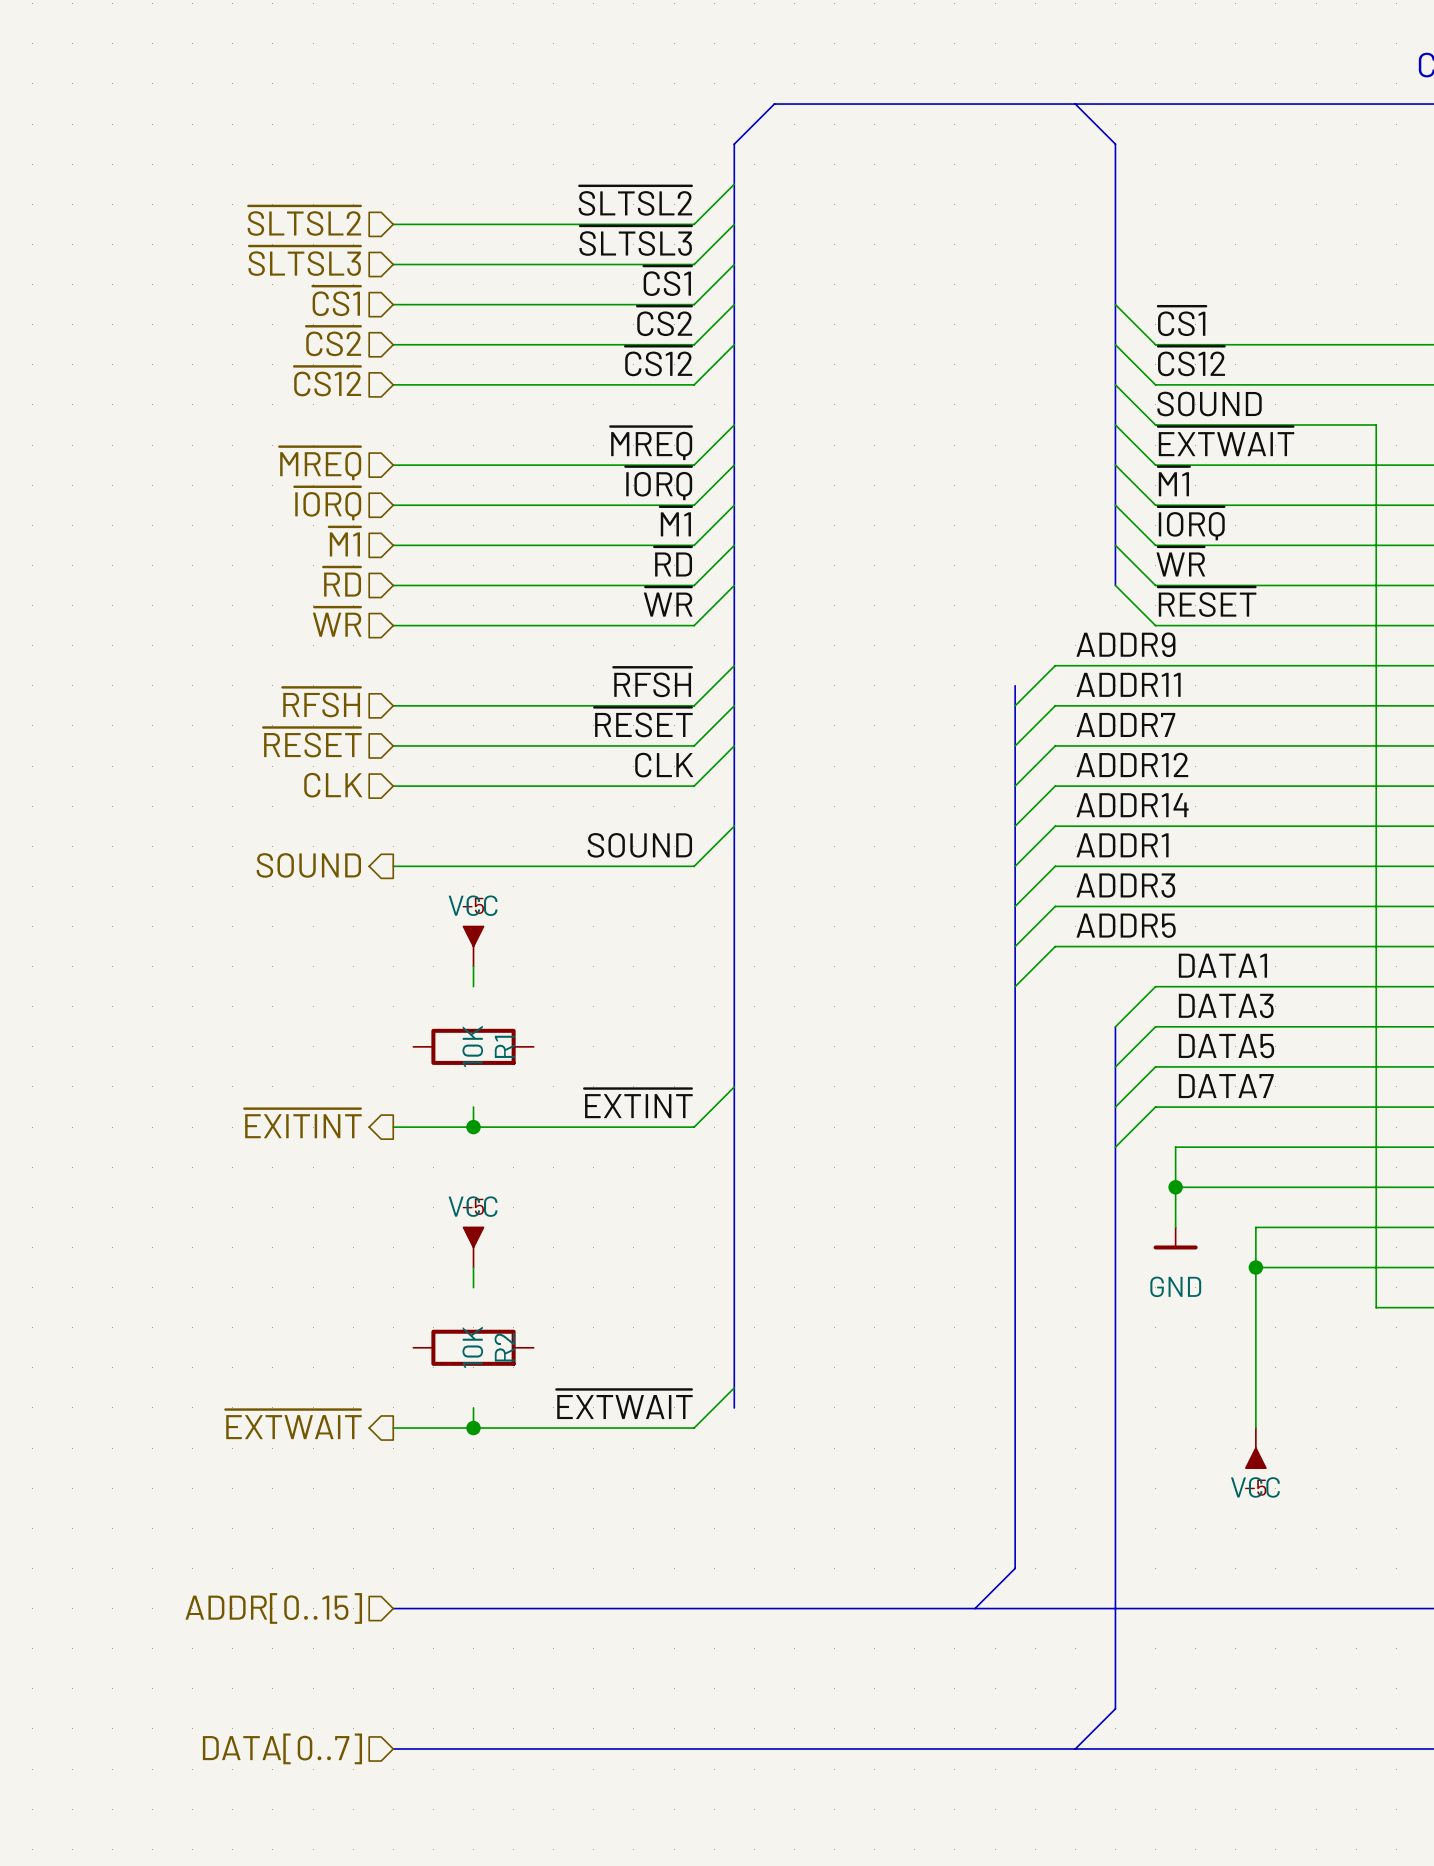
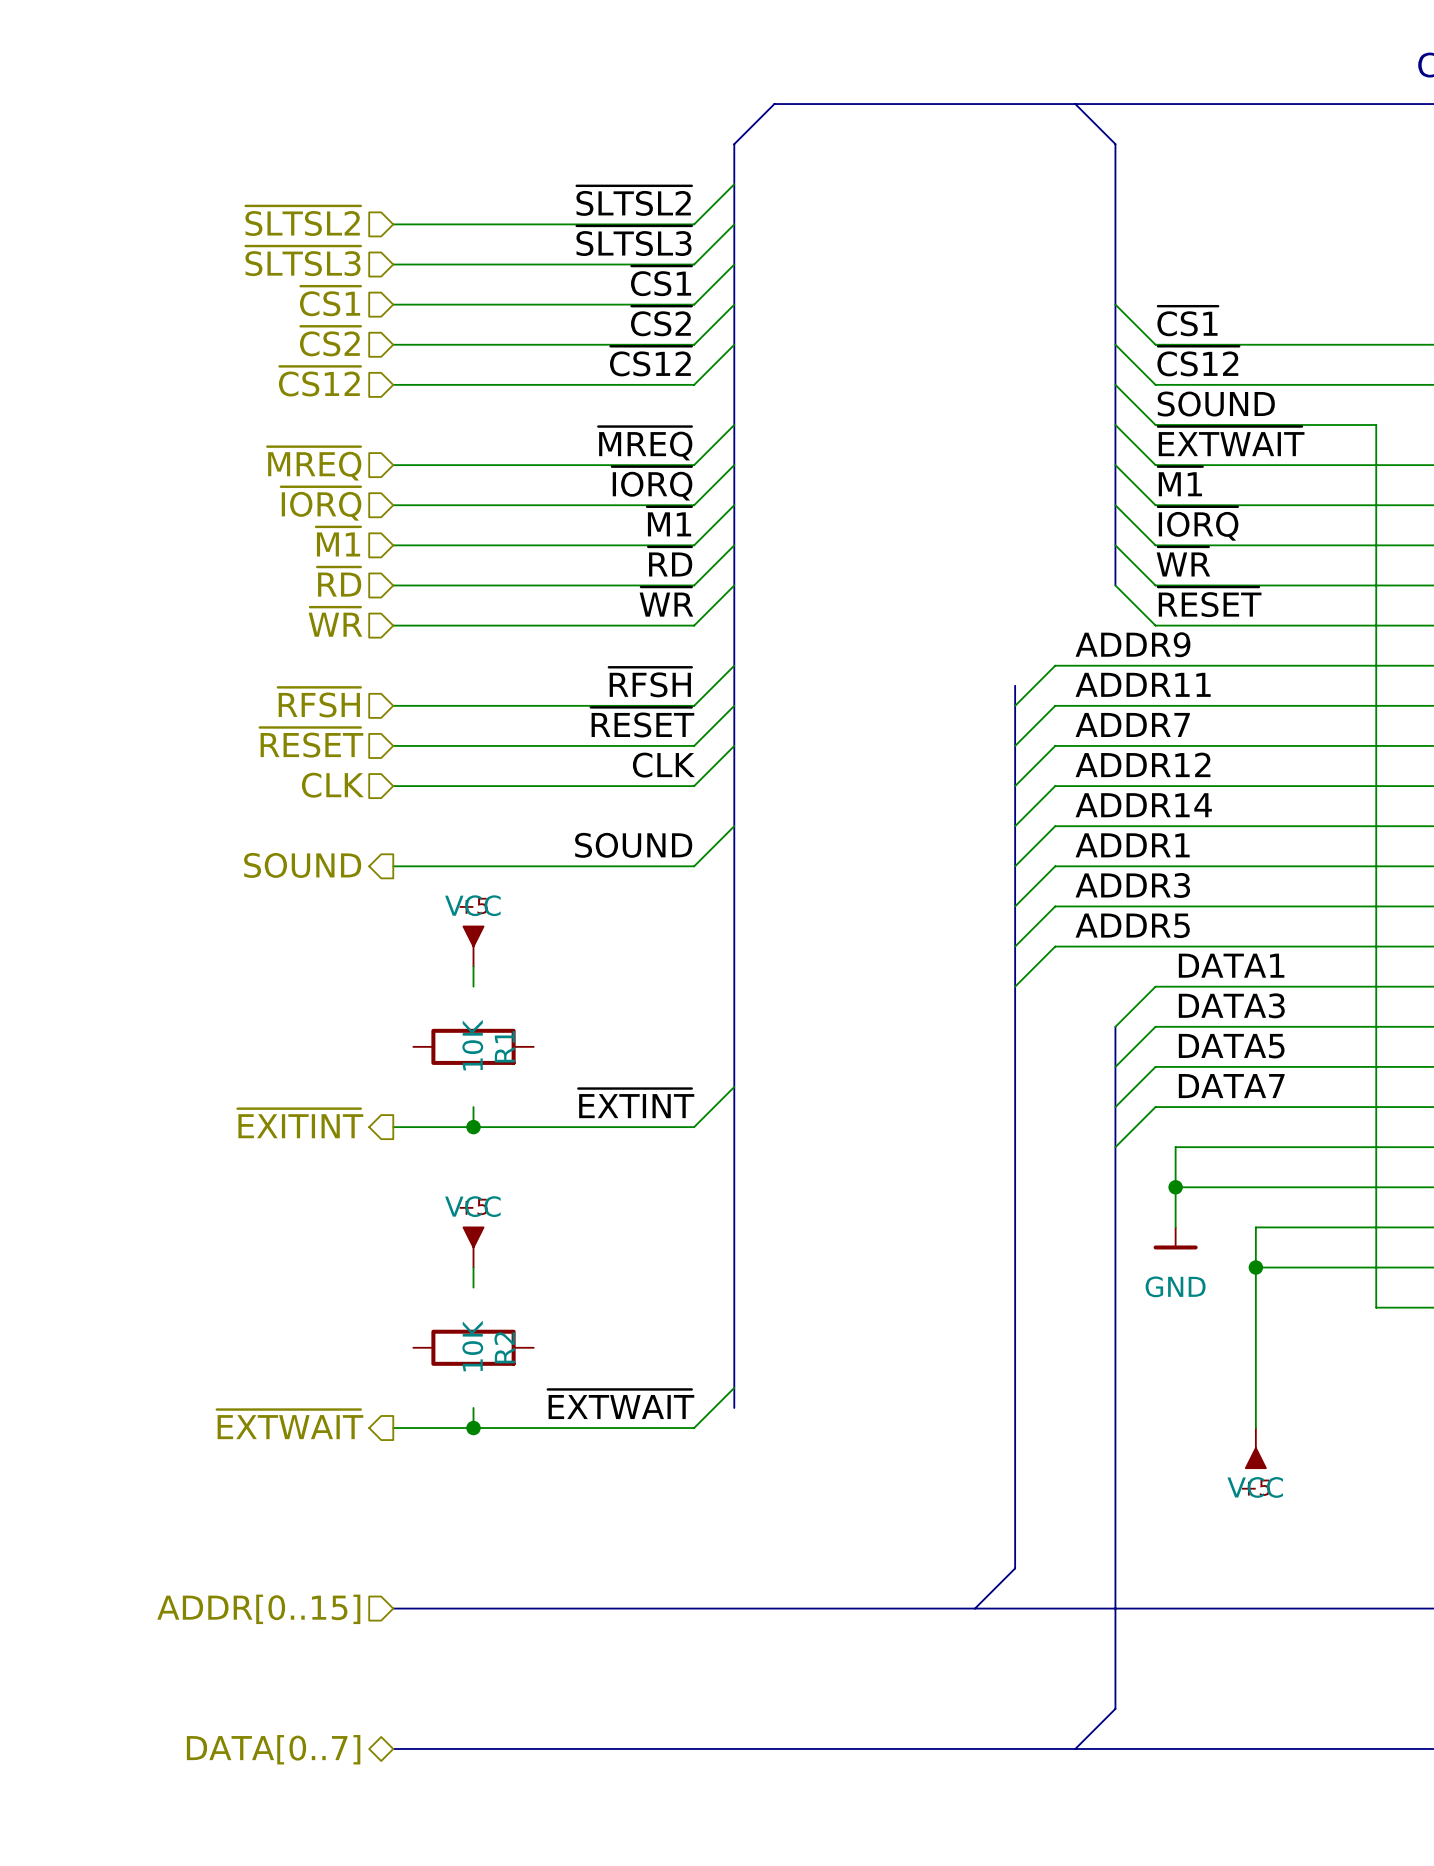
hierarchical label shape: input (282, 1748) -> bidirectional (273, 1749)

